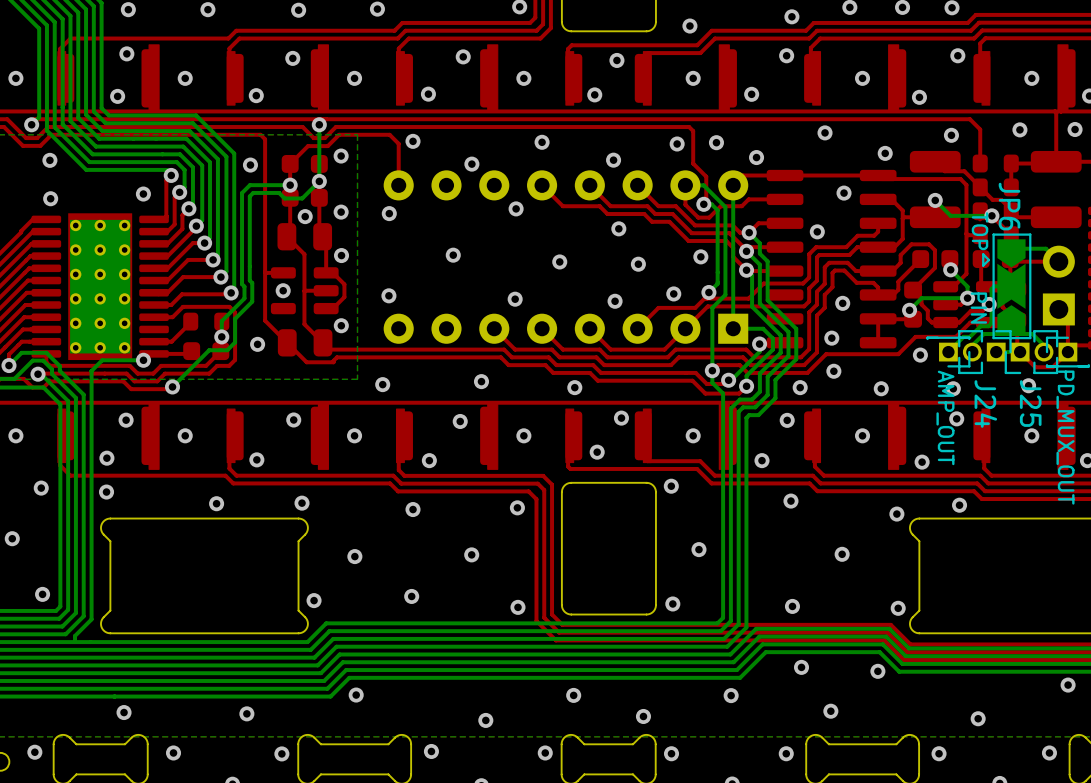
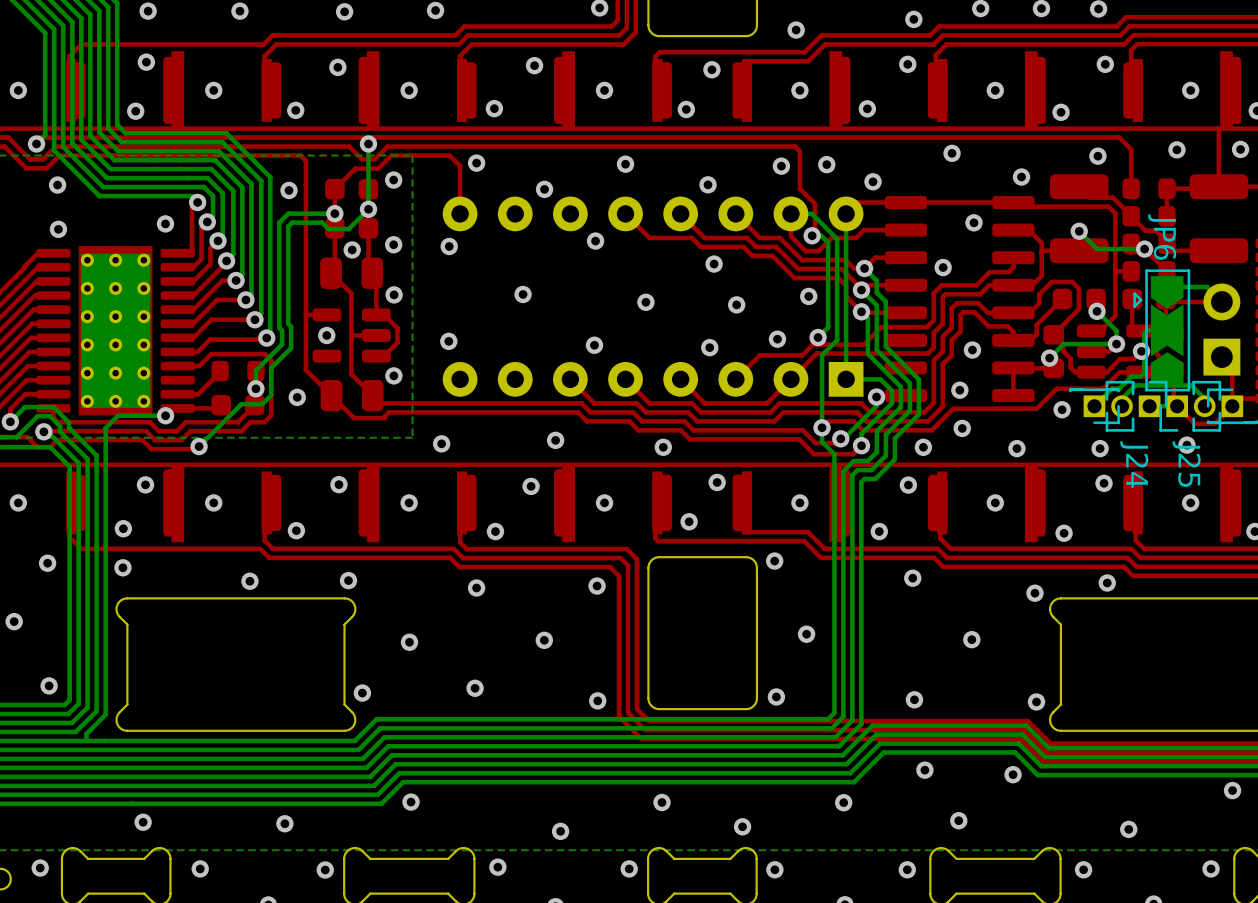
text: TOP (980, 231) -> none
text: PIN (978, 308) -> none
text: AMP_OUT (945, 417) -> none
text: PD_MUX_OUT (1065, 437) -> none

